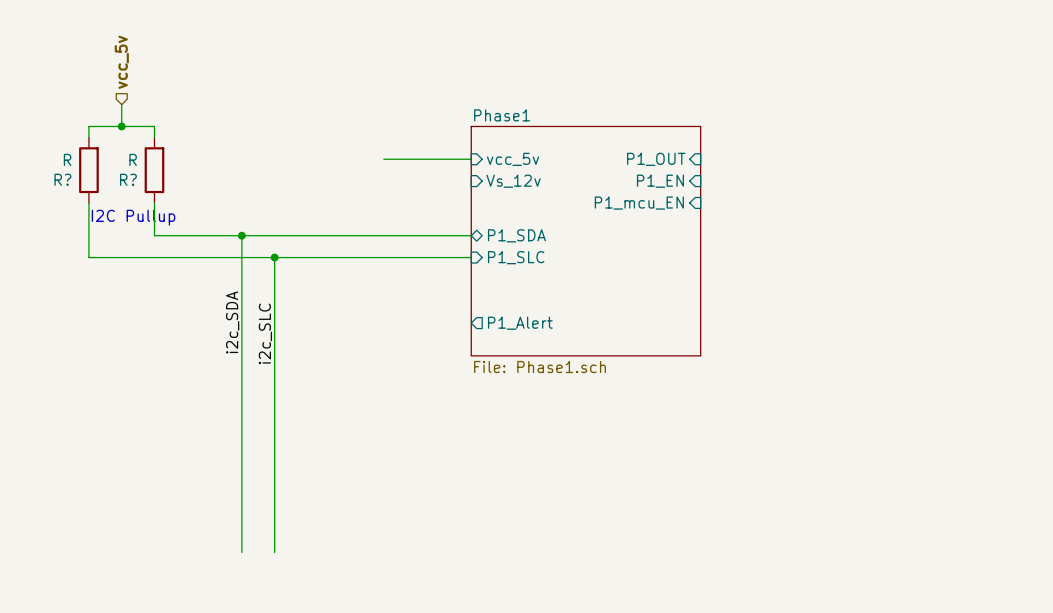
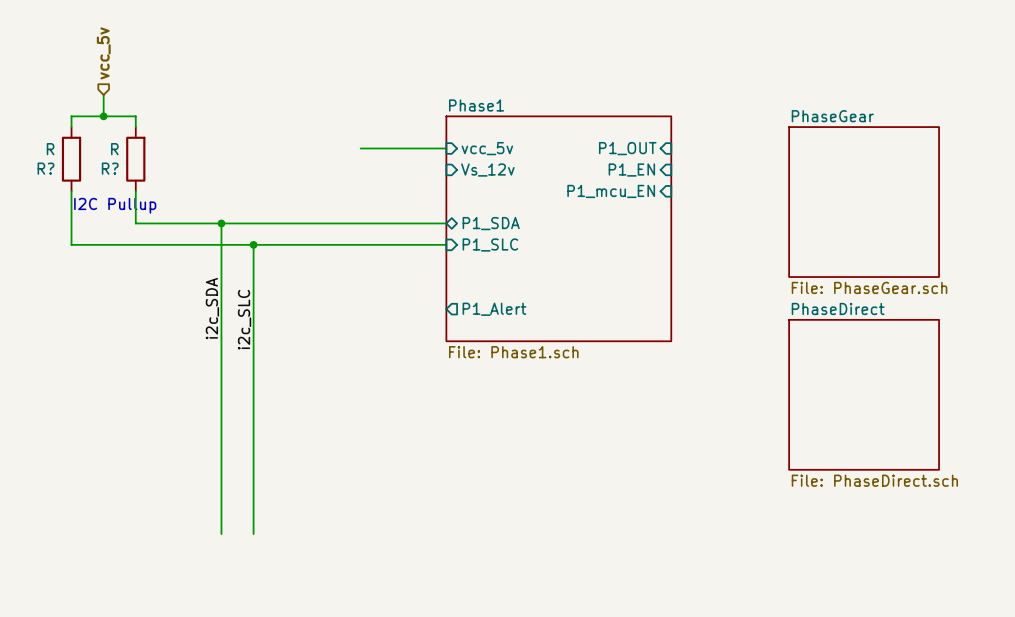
sheet PhaseGear: none -> File: PhaseGear.sch (864, 202)
sheet PhaseDirect: none -> File: PhaseDirect.sch (864, 394)

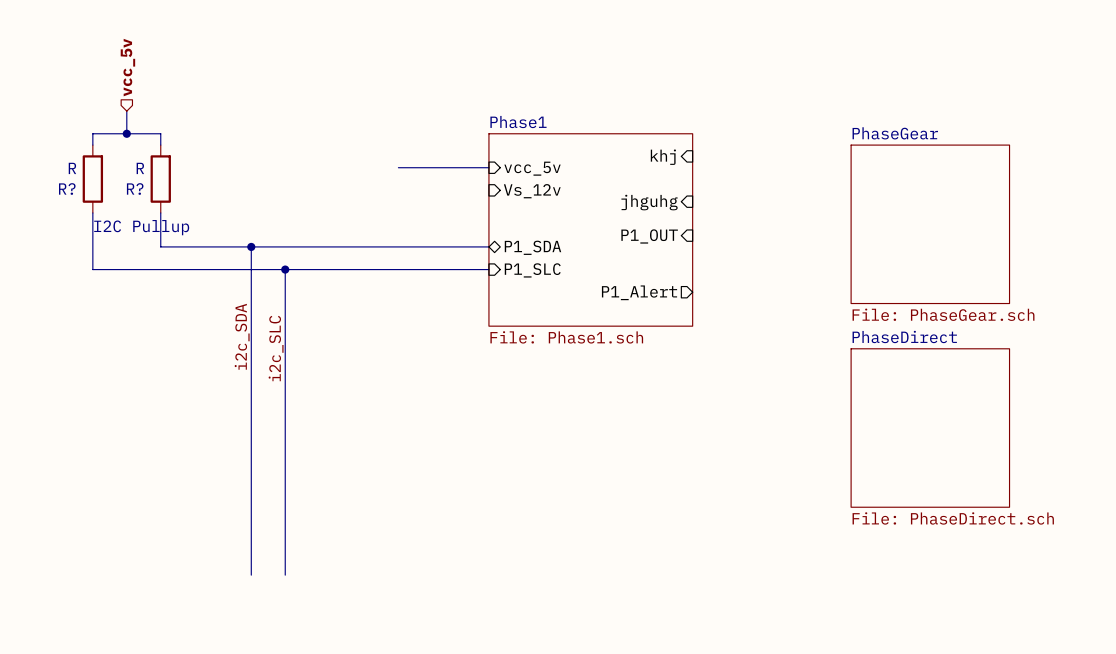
sheet Phase1 shape: [446, 116, 672, 342] -> [488, 133, 693, 327]
sheet pin: none -> khj (663, 157)
sheet pin position: P1_OUT (627, 148) -> P1_OUT (649, 236)
sheet pin: P1_EN (631, 170) -> none
sheet pin: none -> jhguhg (649, 202)
sheet pin: P1_mcu_EN (611, 191) -> none
sheet pin rotation: 0° (494, 309) -> 180° (639, 292)
sheet pin position: P1_Alert (494, 309) -> P1_Alert (639, 292)
sheet Phase1 value position: File: Phase1.sch (513, 352) -> File: Phase1.sch (566, 337)

